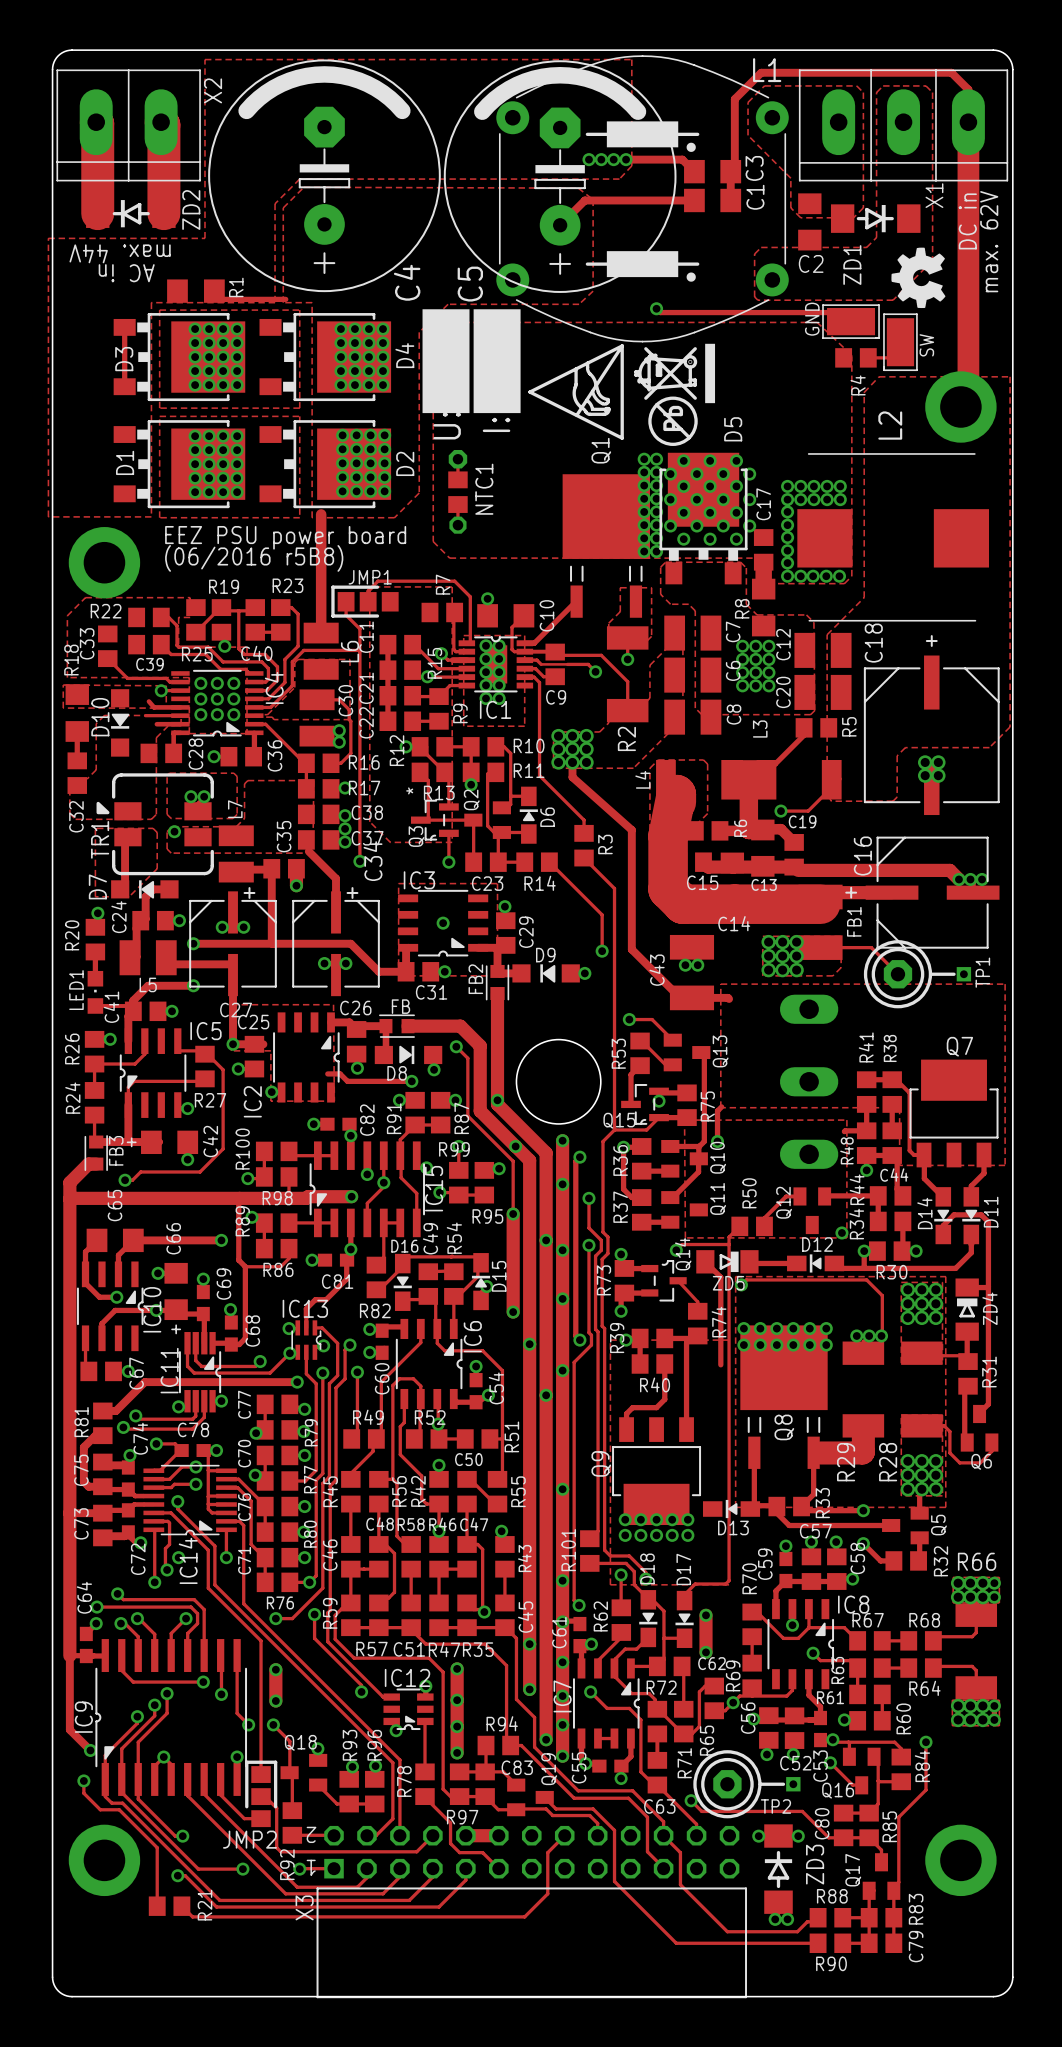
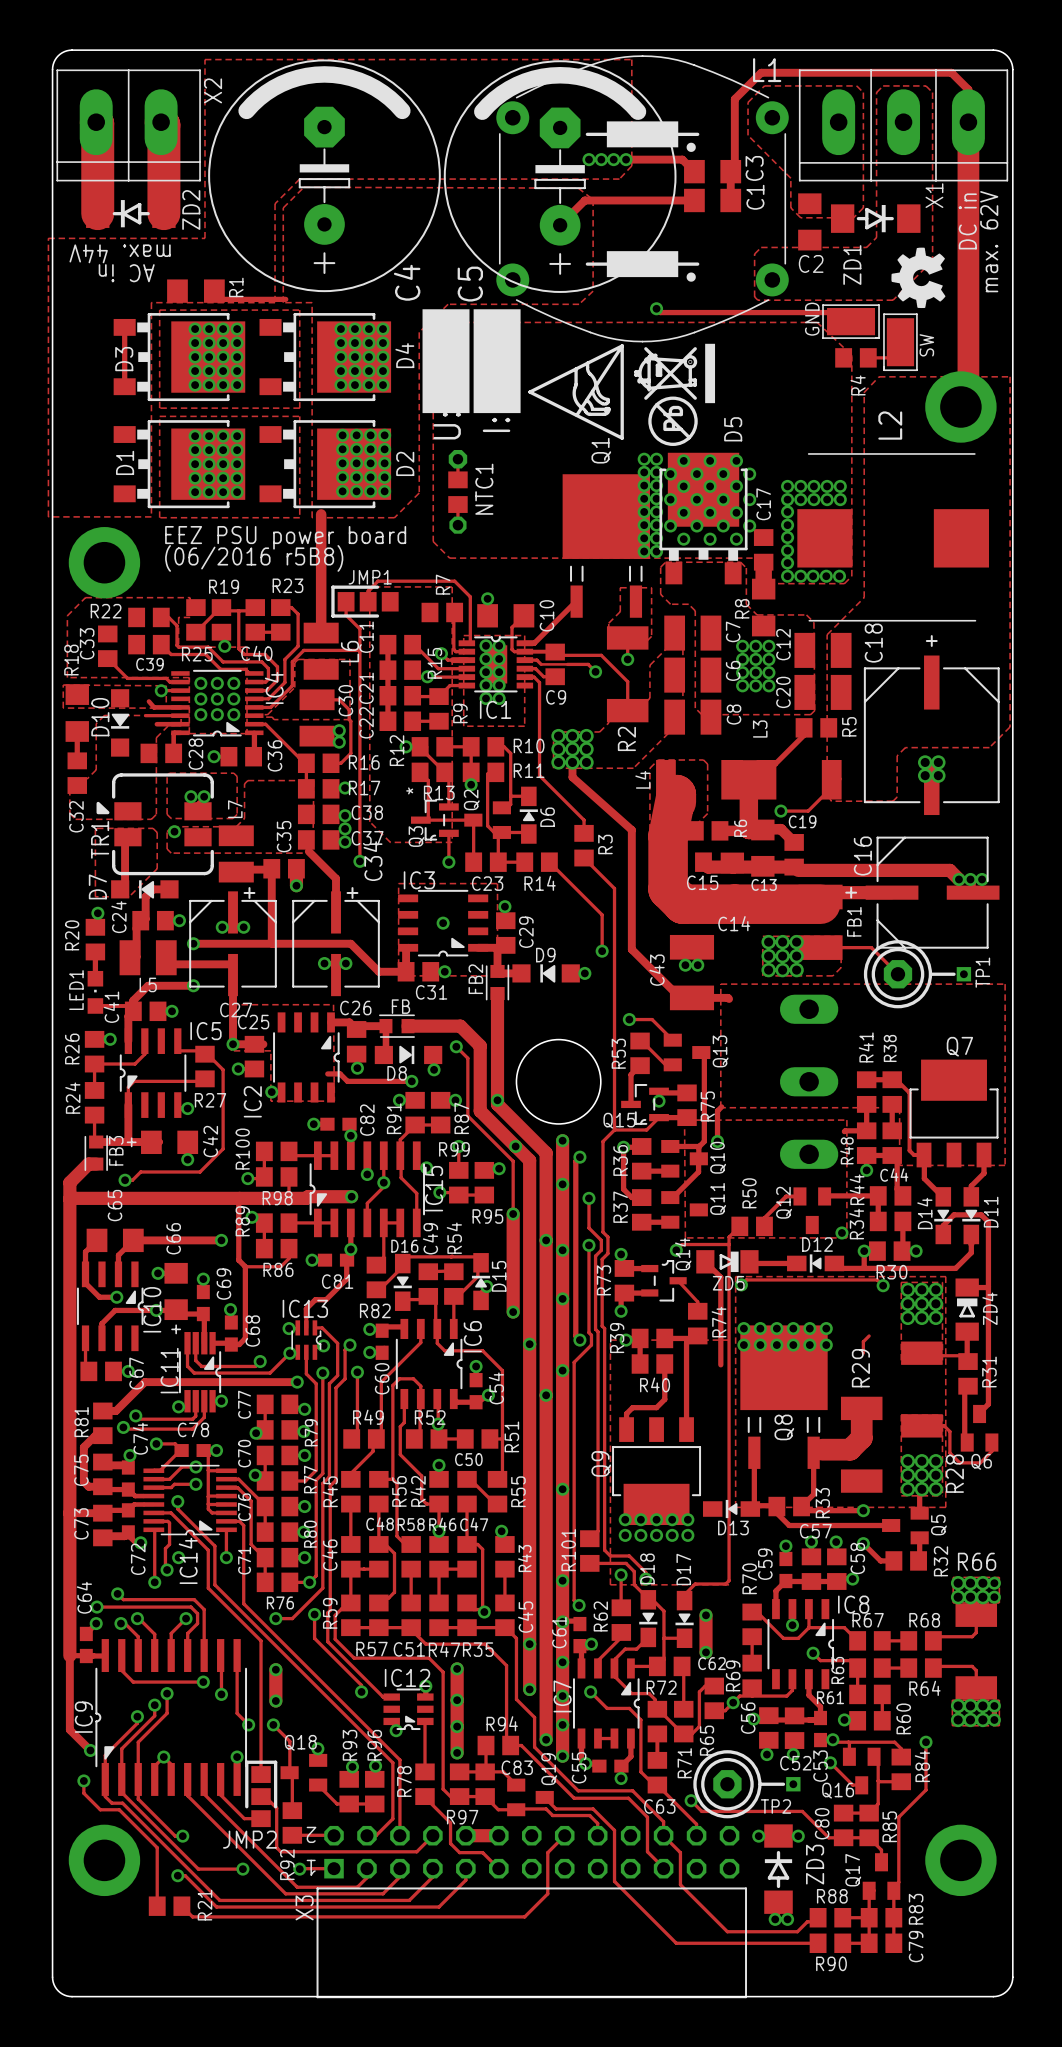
track: (866, 1279) (882, 1295) (882, 1335) -> (866, 1279) (877, 1279) (883, 1285)
via: none -> (883, 1285)
via: (856, 1335) -> none
via: (869, 1335) -> none
via: (881, 1335) -> none
R29 position: (863, 1389) -> (861, 1444)
track: none -> (861, 1408) (861, 1438) (850, 1449) (816, 1449) (813, 1452)
track: (863, 1427) (862, 1452) (813, 1452) -> none
R29 name position: R29 (846, 1462) -> R29 (860, 1368)
R28 name position: R28 (888, 1462) -> R28 (954, 1473)

